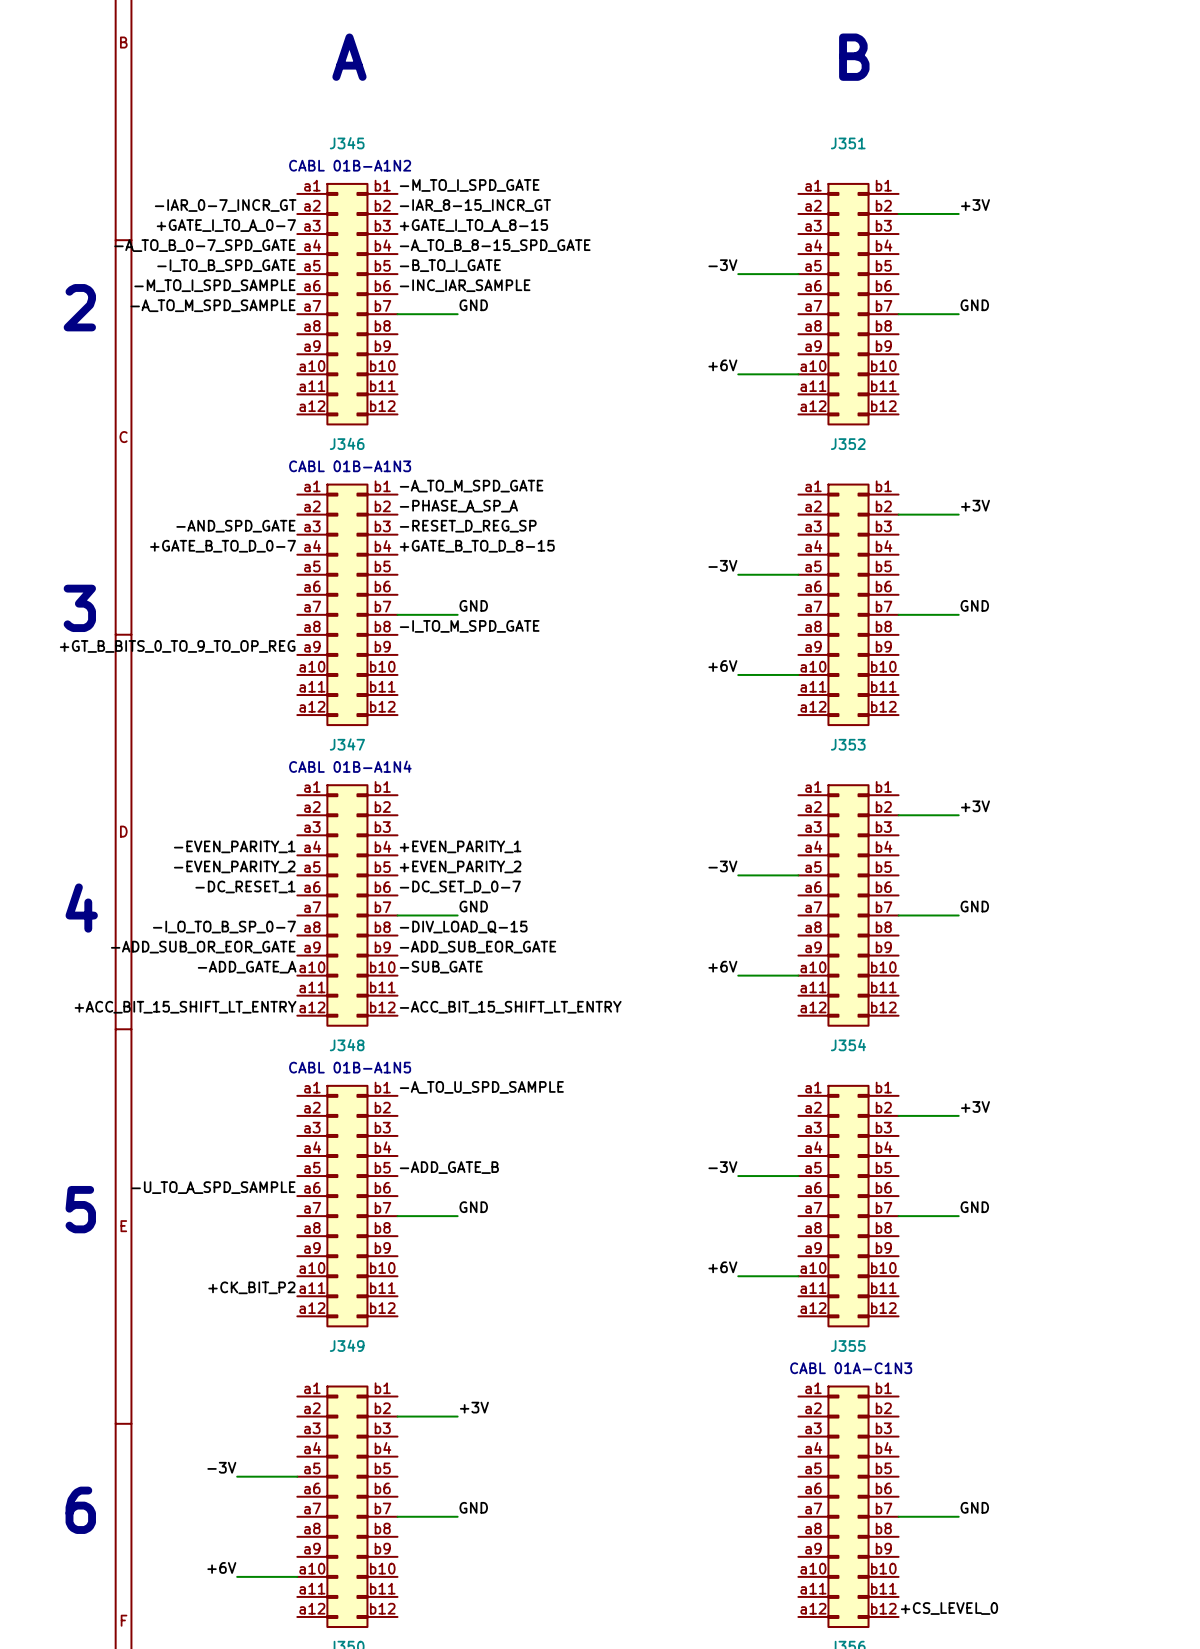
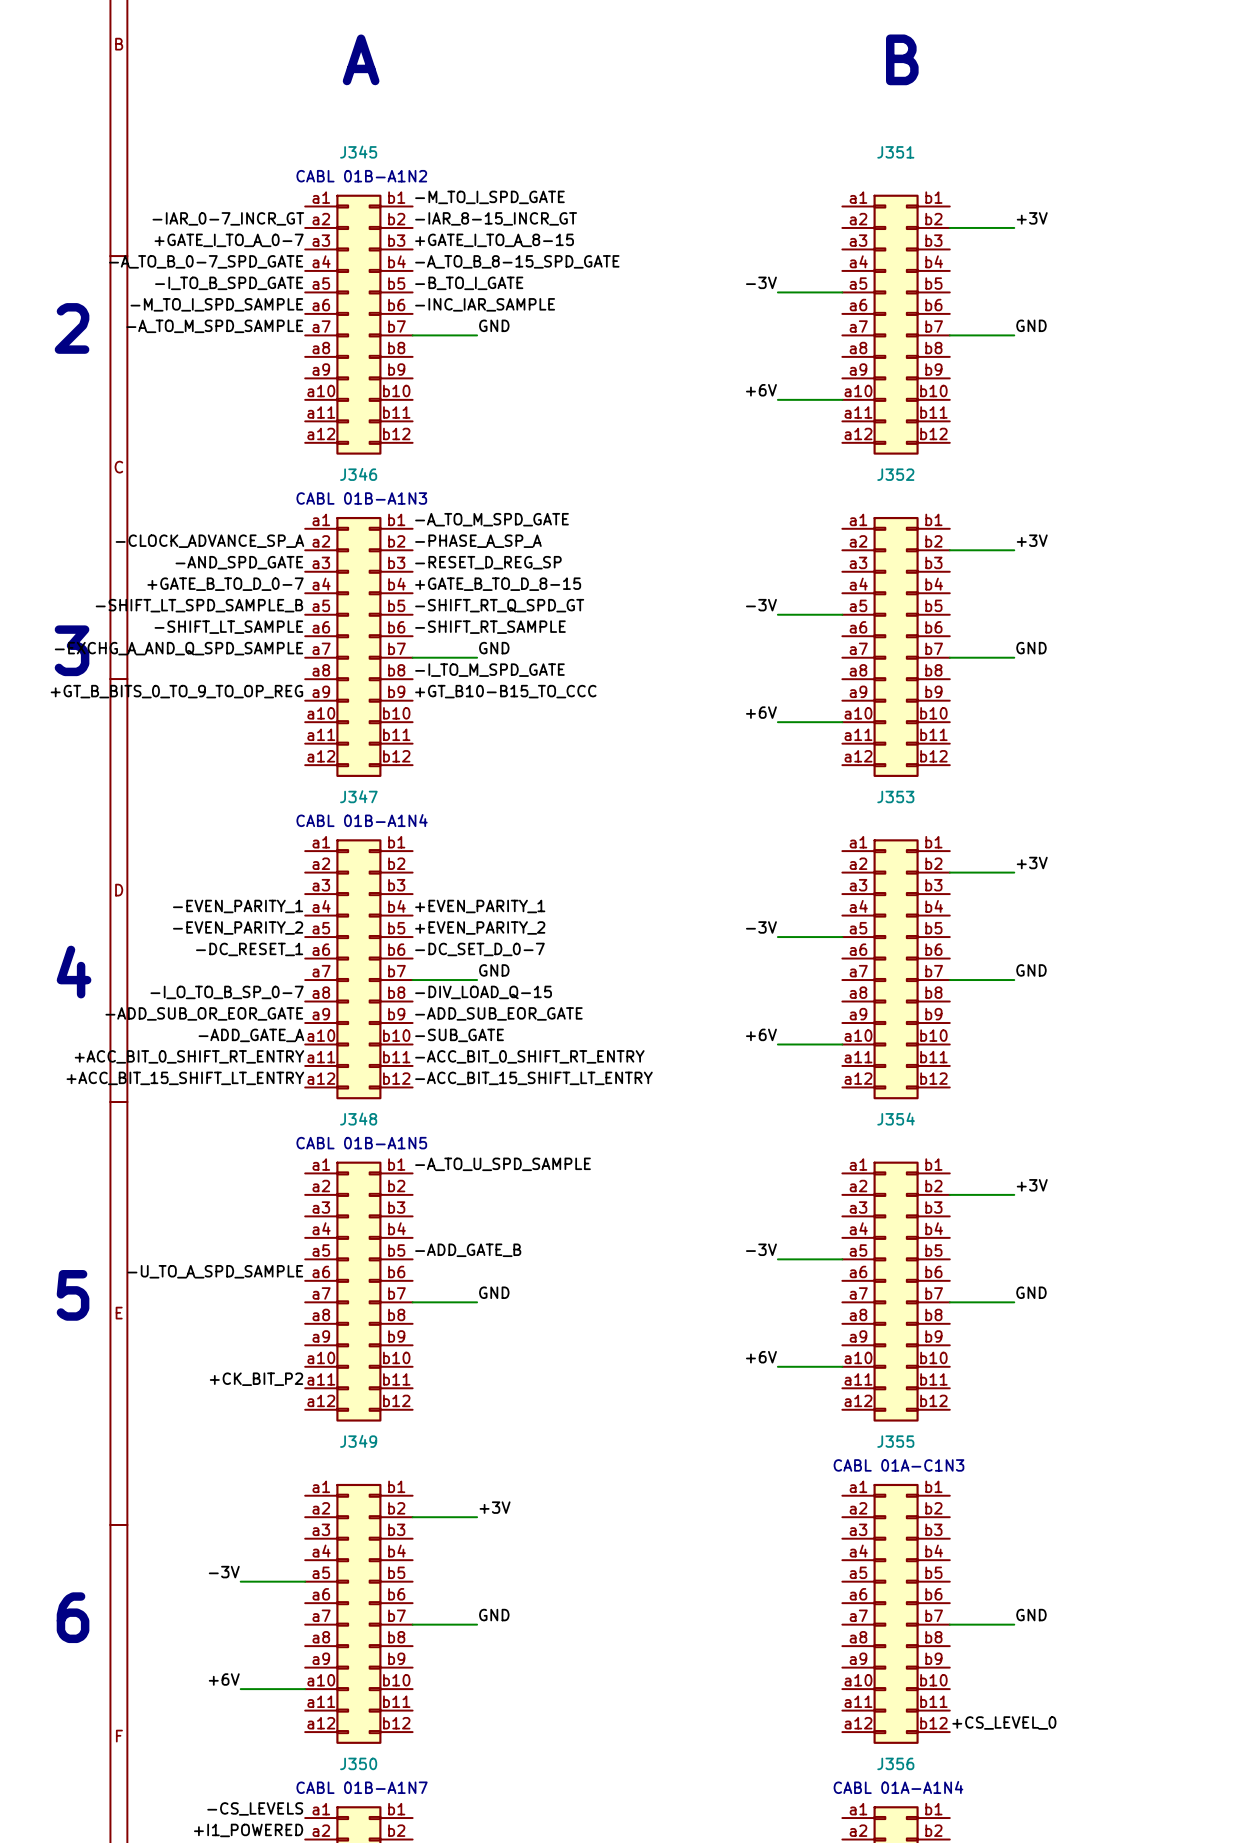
label: none -> -CLOCK_ADVANCE_SP_A (209, 541)
label: none -> -SHIFT_LT_SPD_SAMPLE_B (199, 605)
label: none -> -SHIFT_RT_Q_SPD_GT (499, 605)
label: none -> -SHIFT_LT_SAMPLE (228, 627)
label: none -> -SHIFT_RT_SAMPLE (490, 627)
label: none -> -EXCHG_A_AND_Q_SPD_SAMPLE (178, 648)
label: none -> +GT_B10-B15_TO_CCC (505, 691)
label: none -> +ACC_BIT_0_SHIFT_RT_ENTRY (189, 1056)
label: none -> -ACC_BIT_0_SHIFT_RT_ENTRY (529, 1056)

